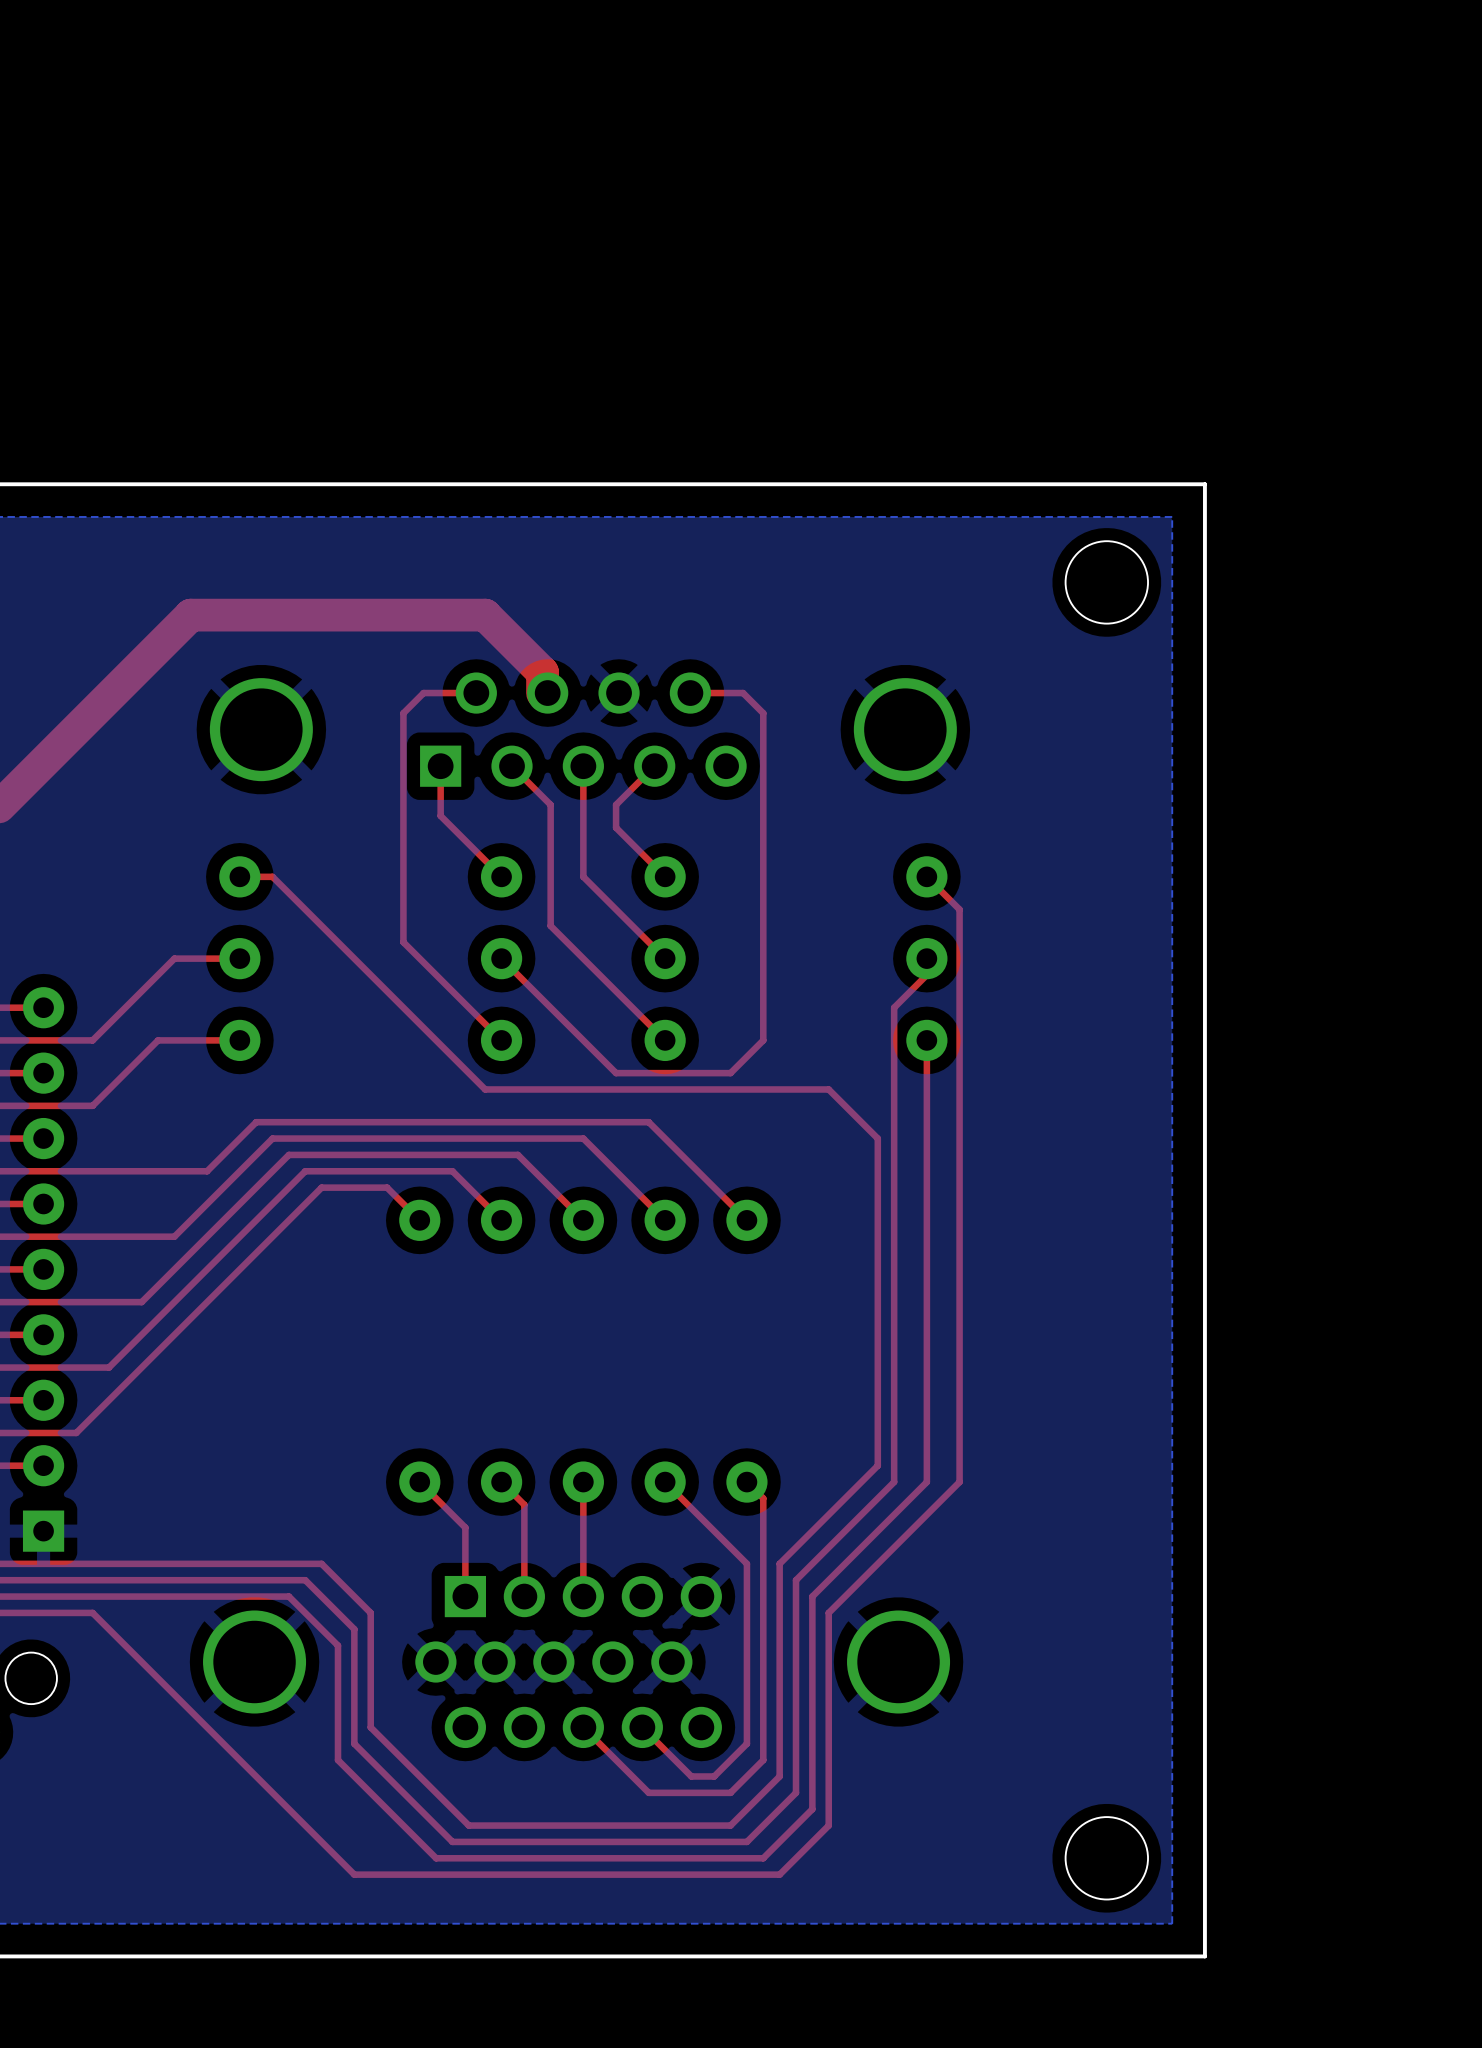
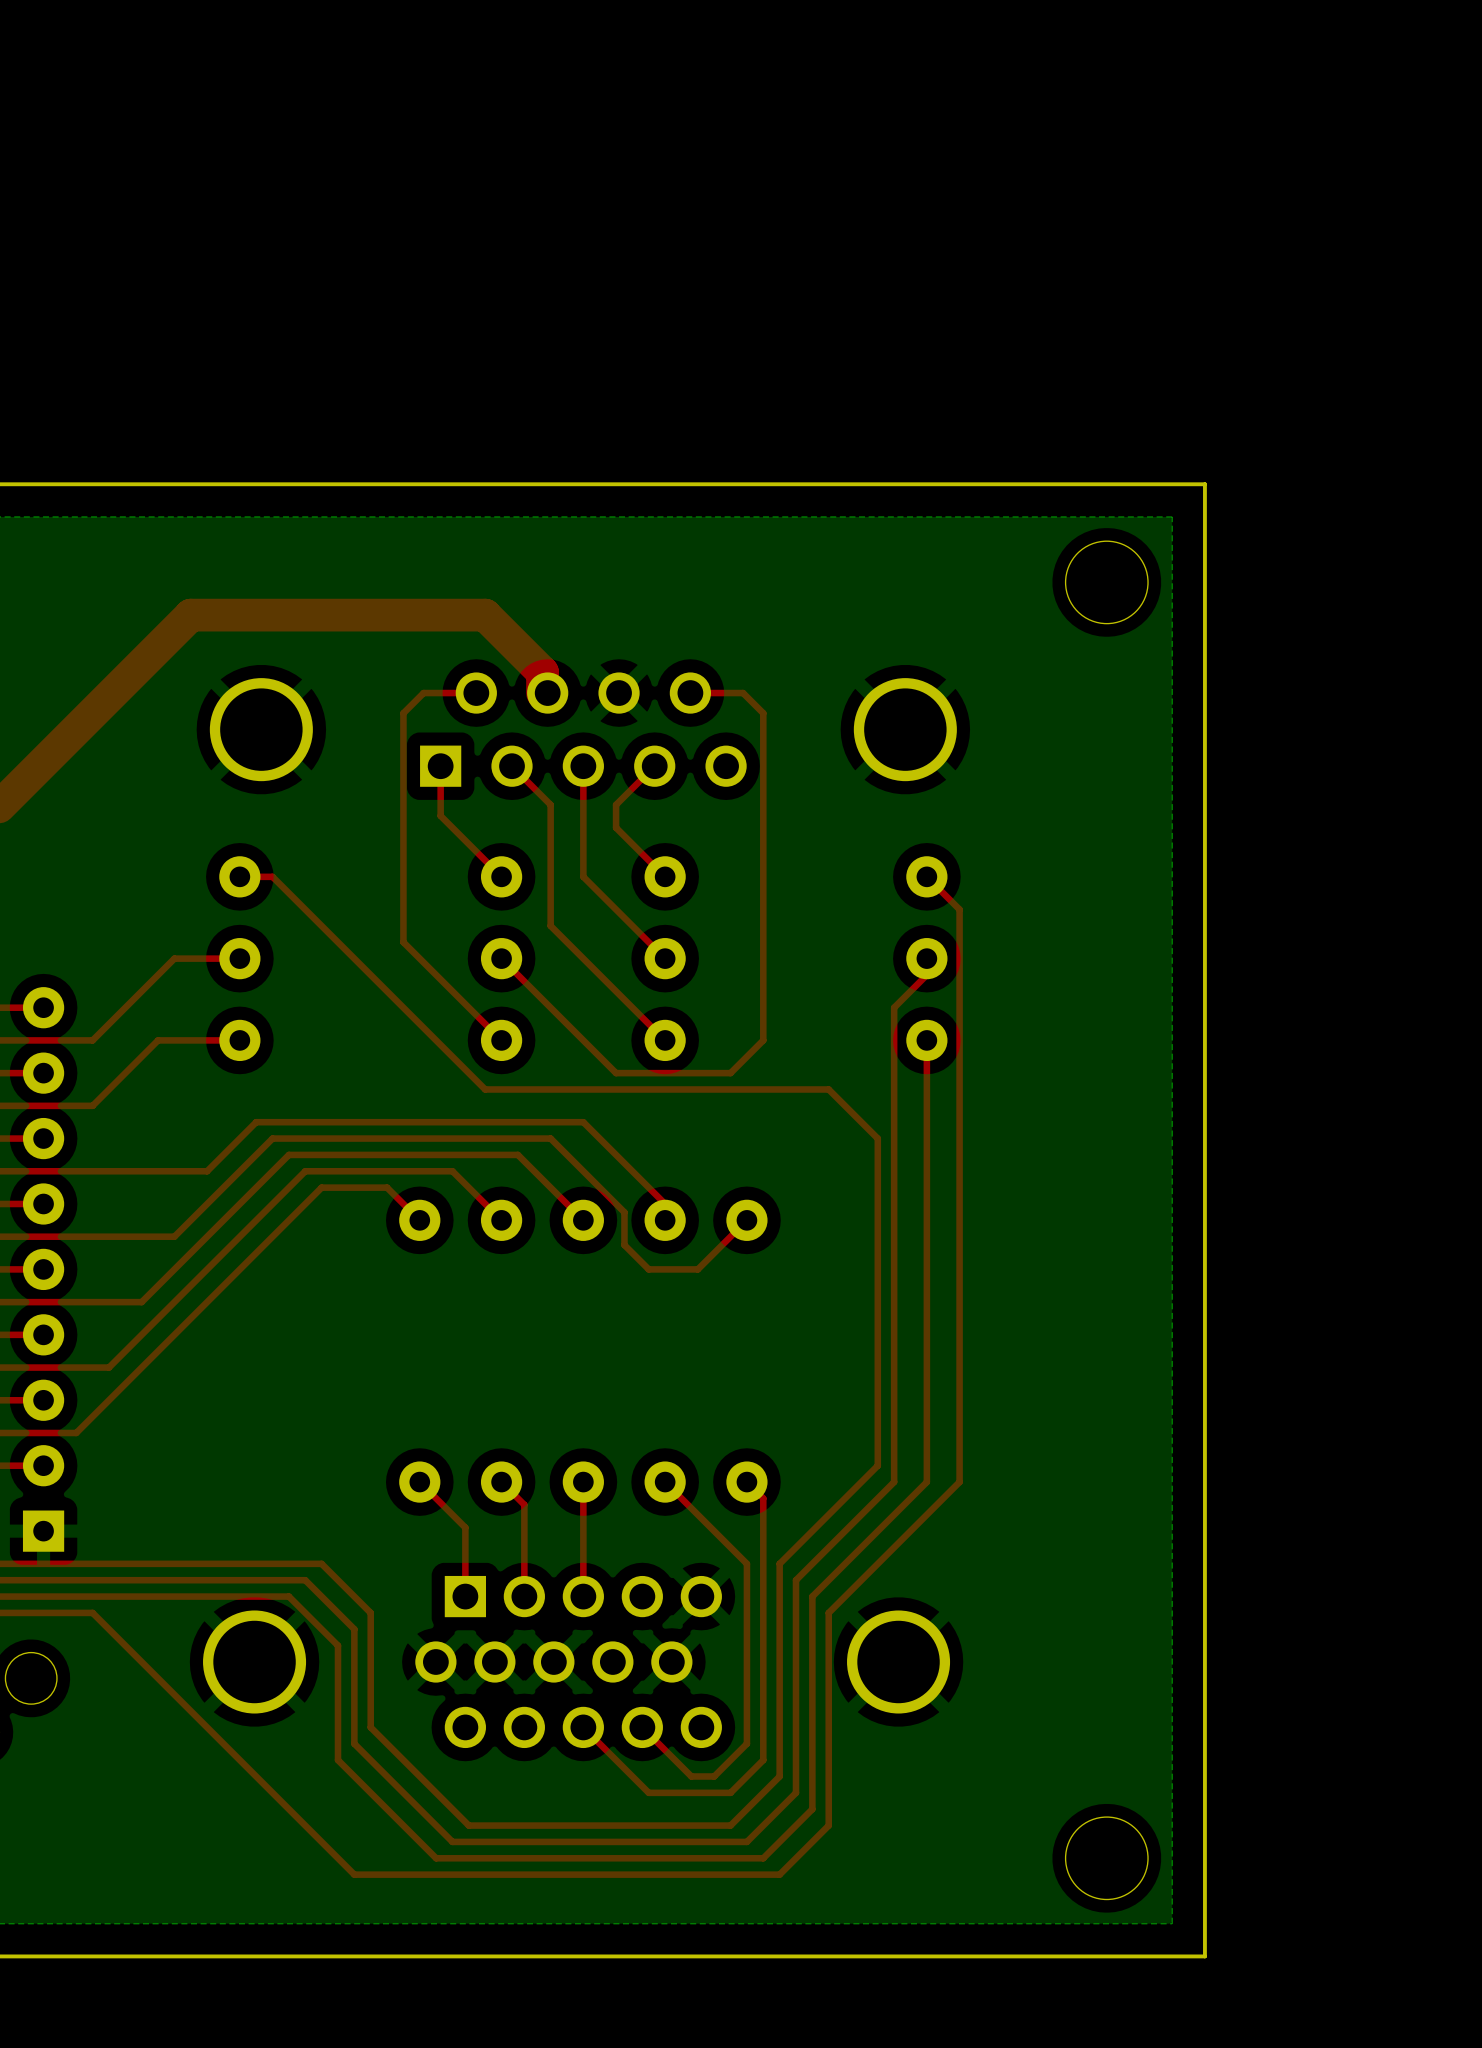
top track: (583, 1122) (648, 1122) (746, 1220) -> (550, 1138) (624, 1212) (624, 1245) (648, 1269) (697, 1269) (746, 1220)
top track: (550, 1138) (583, 1138) (665, 1220) -> (583, 1122) (665, 1203) (665, 1220)

